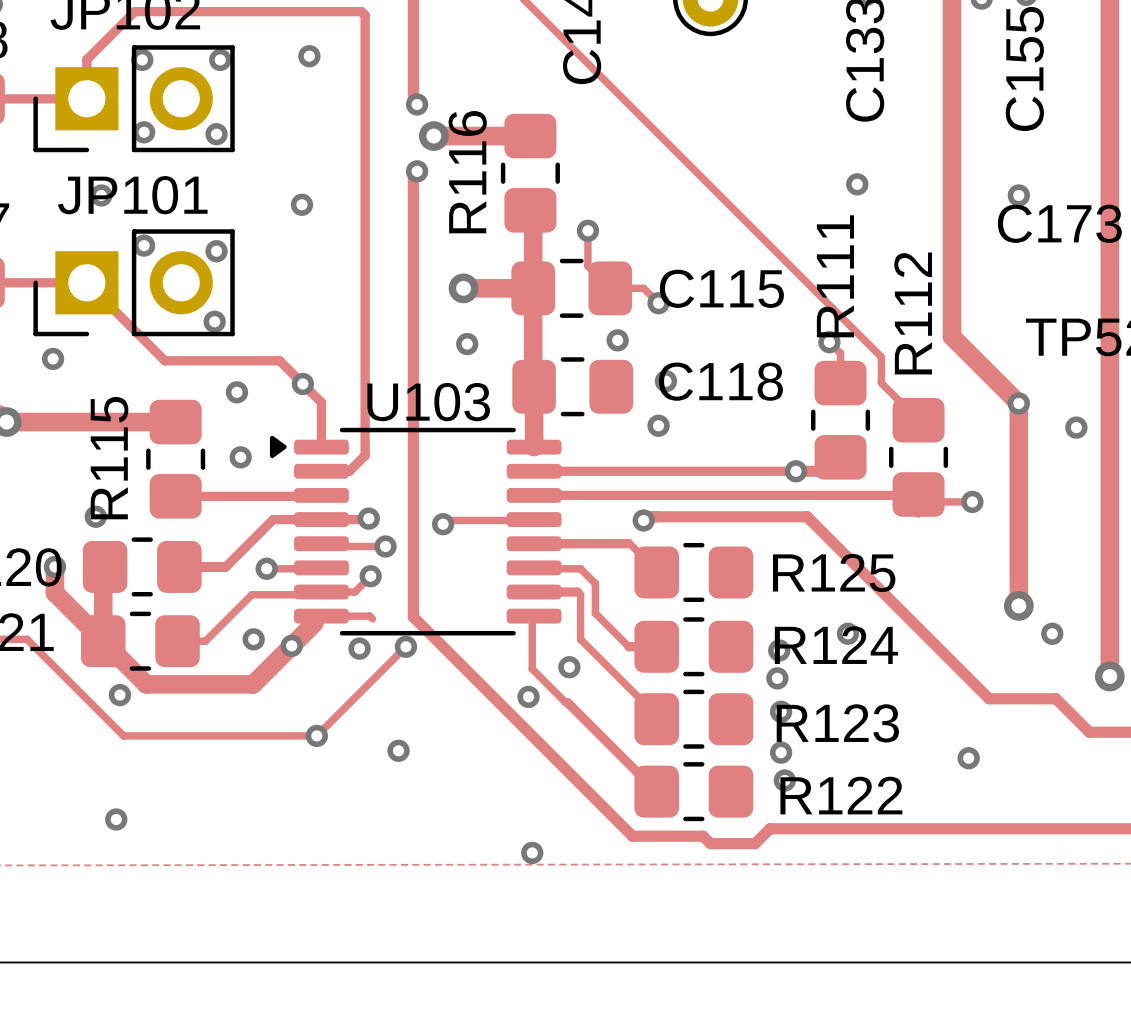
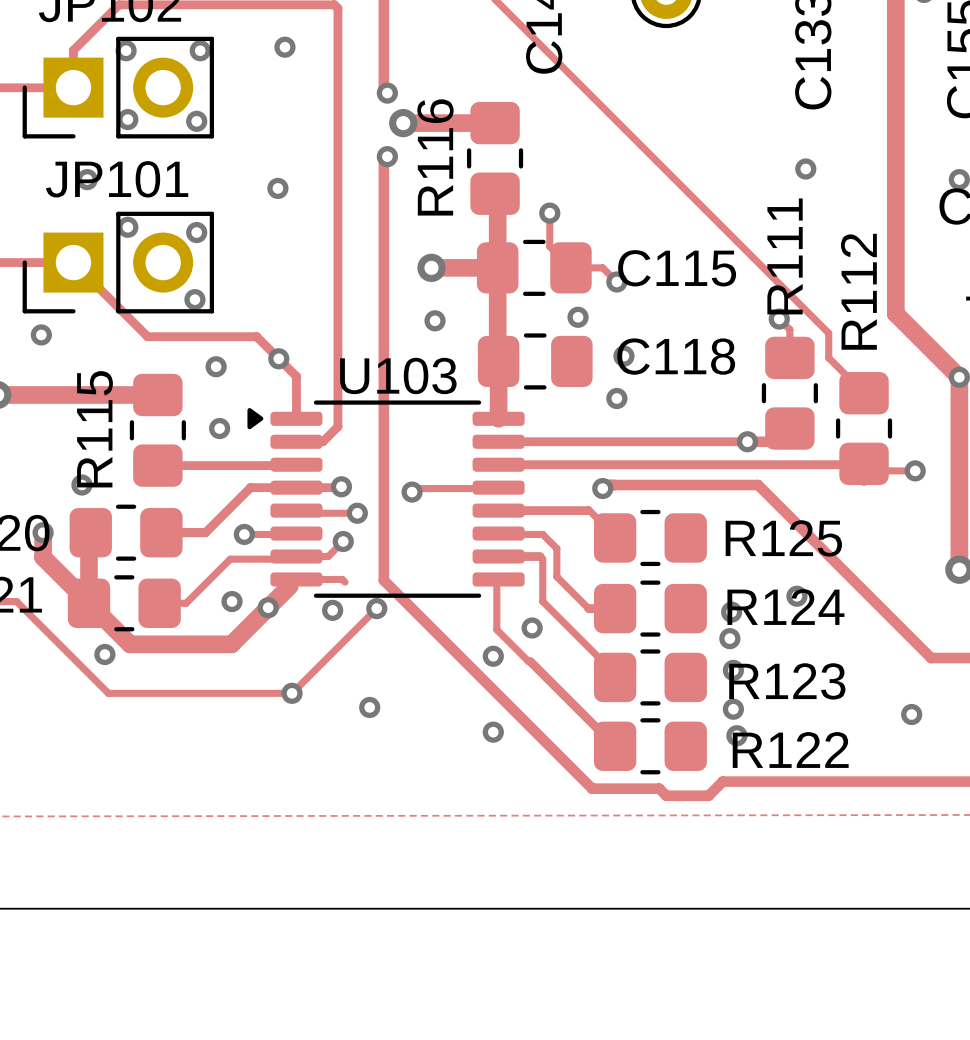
via: (116, 819) -> none
via position: (532, 852) -> (493, 732)

